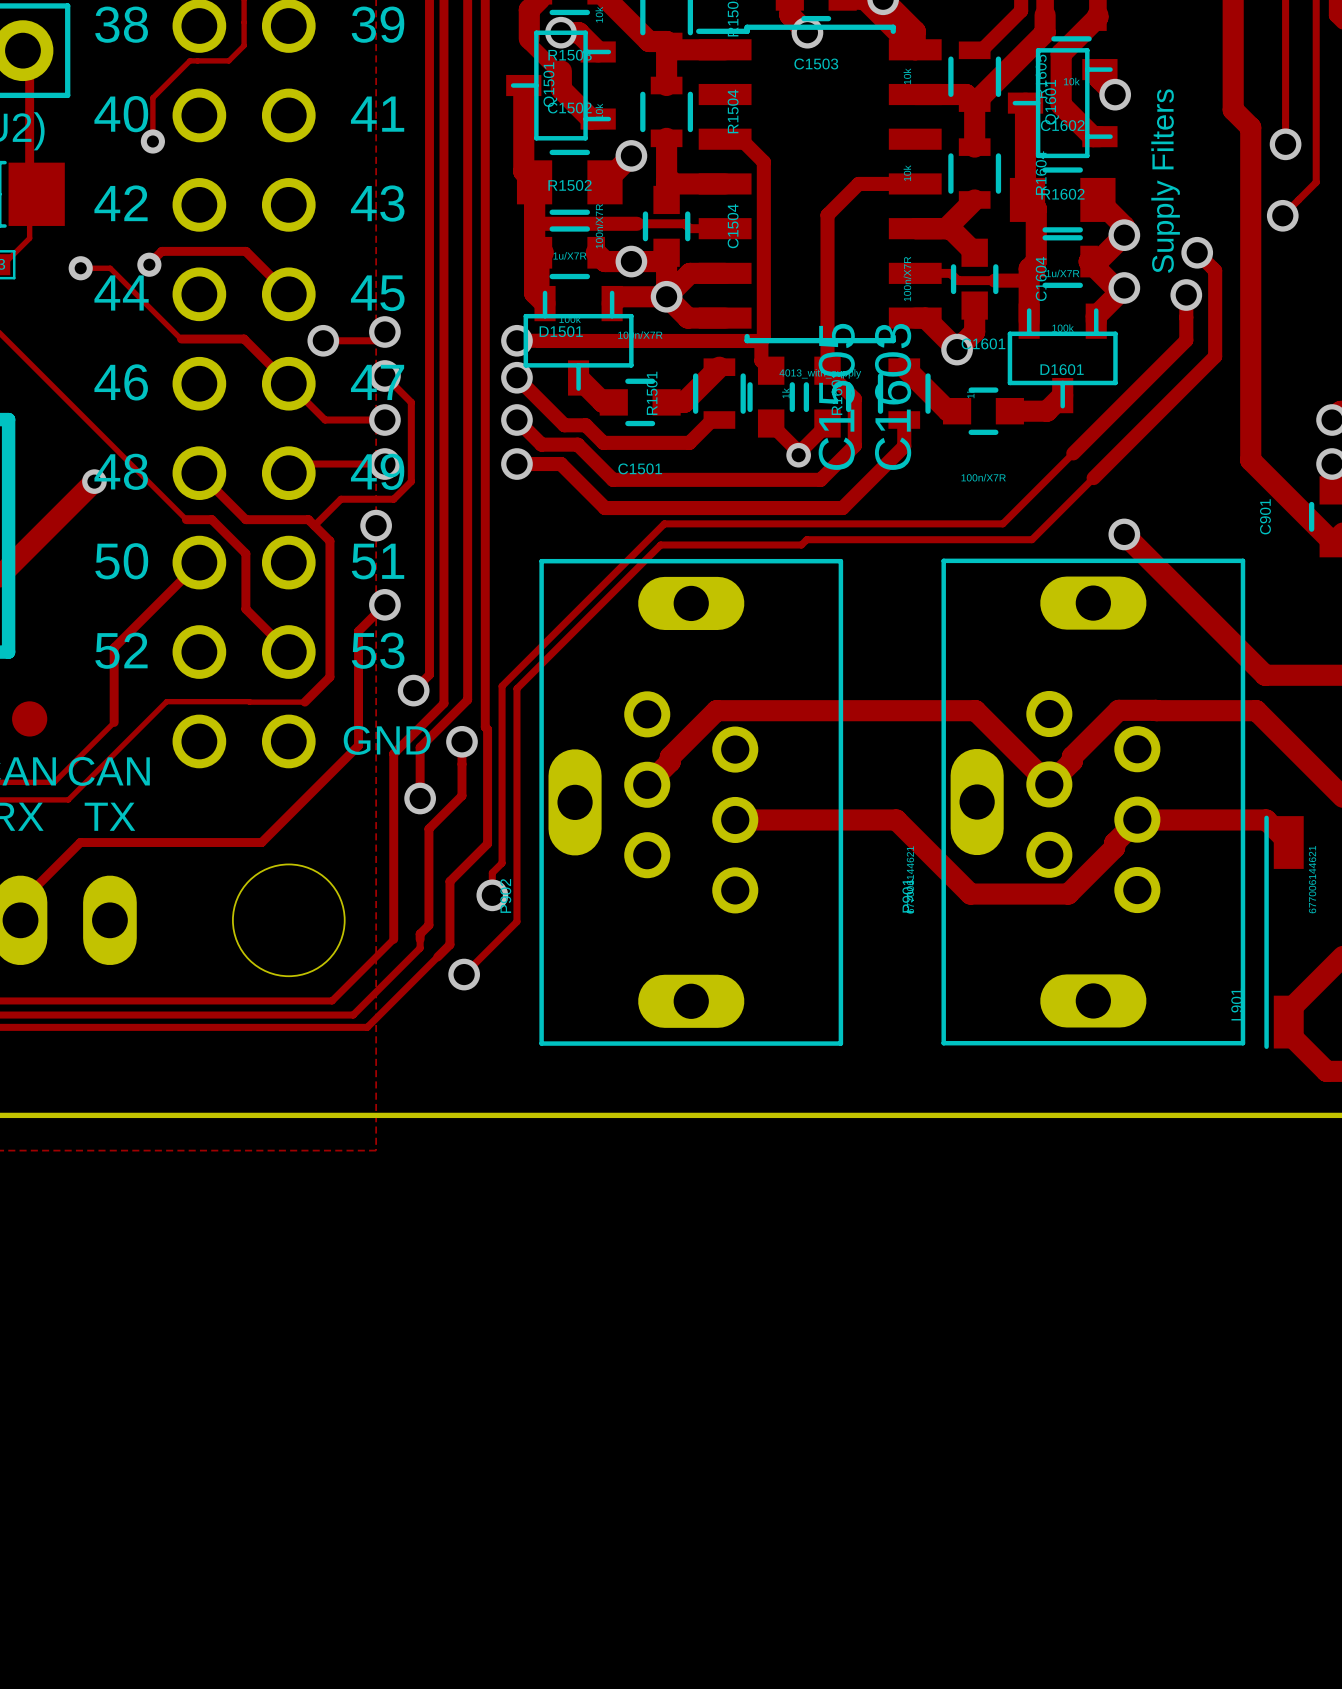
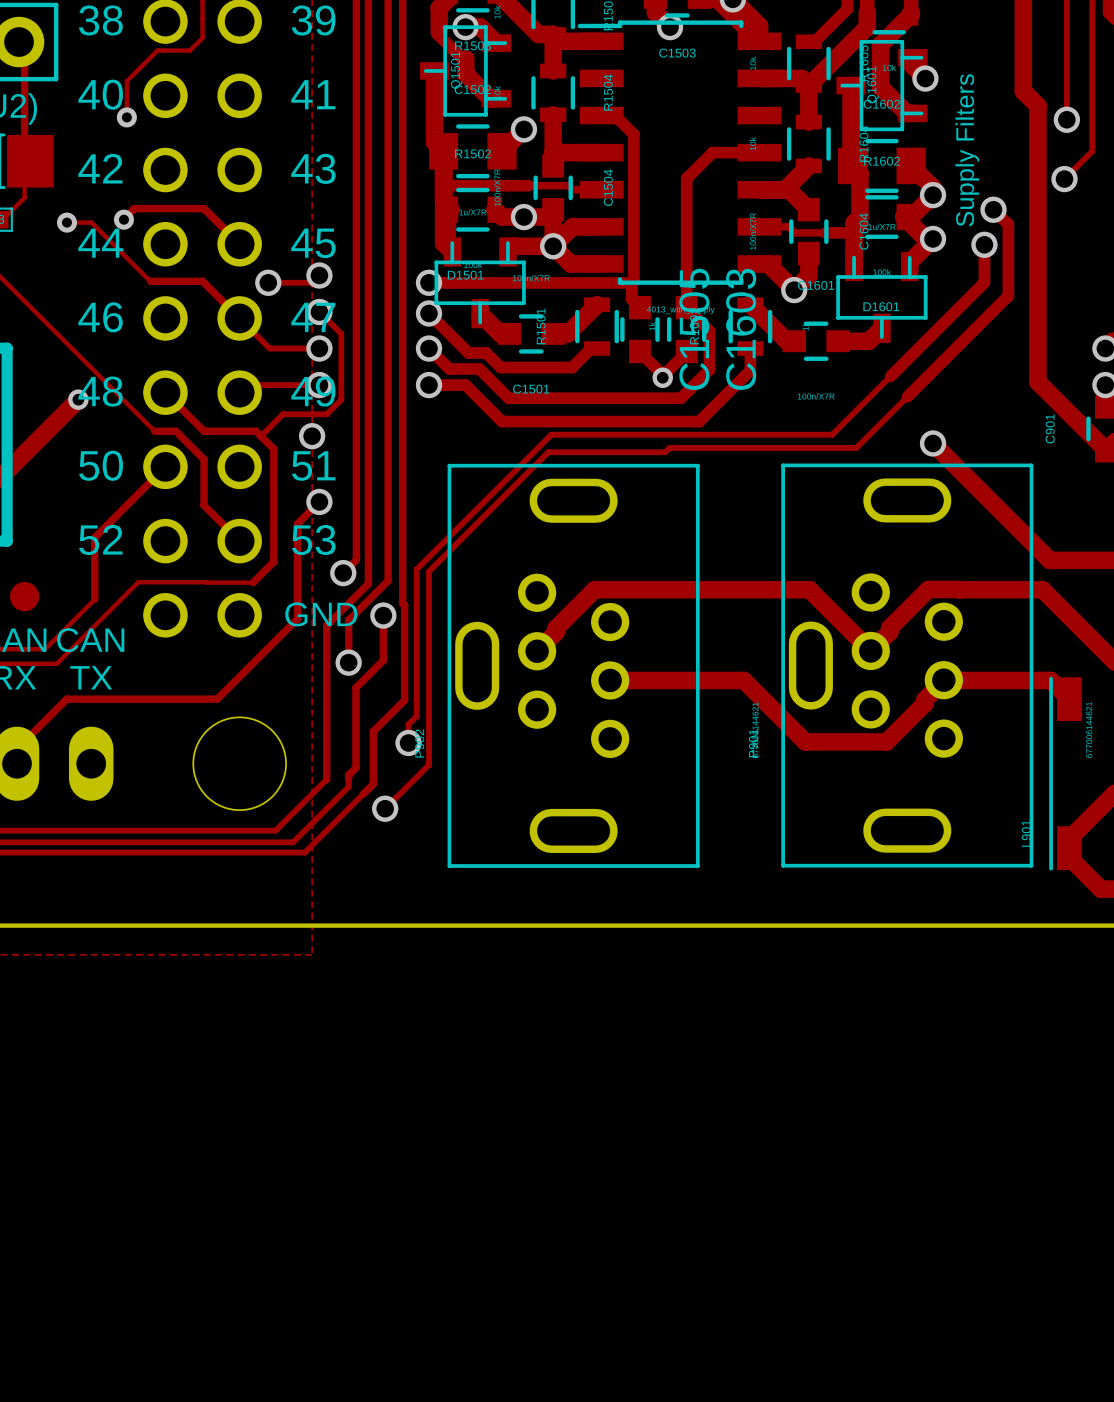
P902 footprint: [539, 558, 844, 1046] -> [447, 463, 700, 868]
P901 footprint: [941, 558, 1246, 1046] -> [781, 463, 1034, 868]

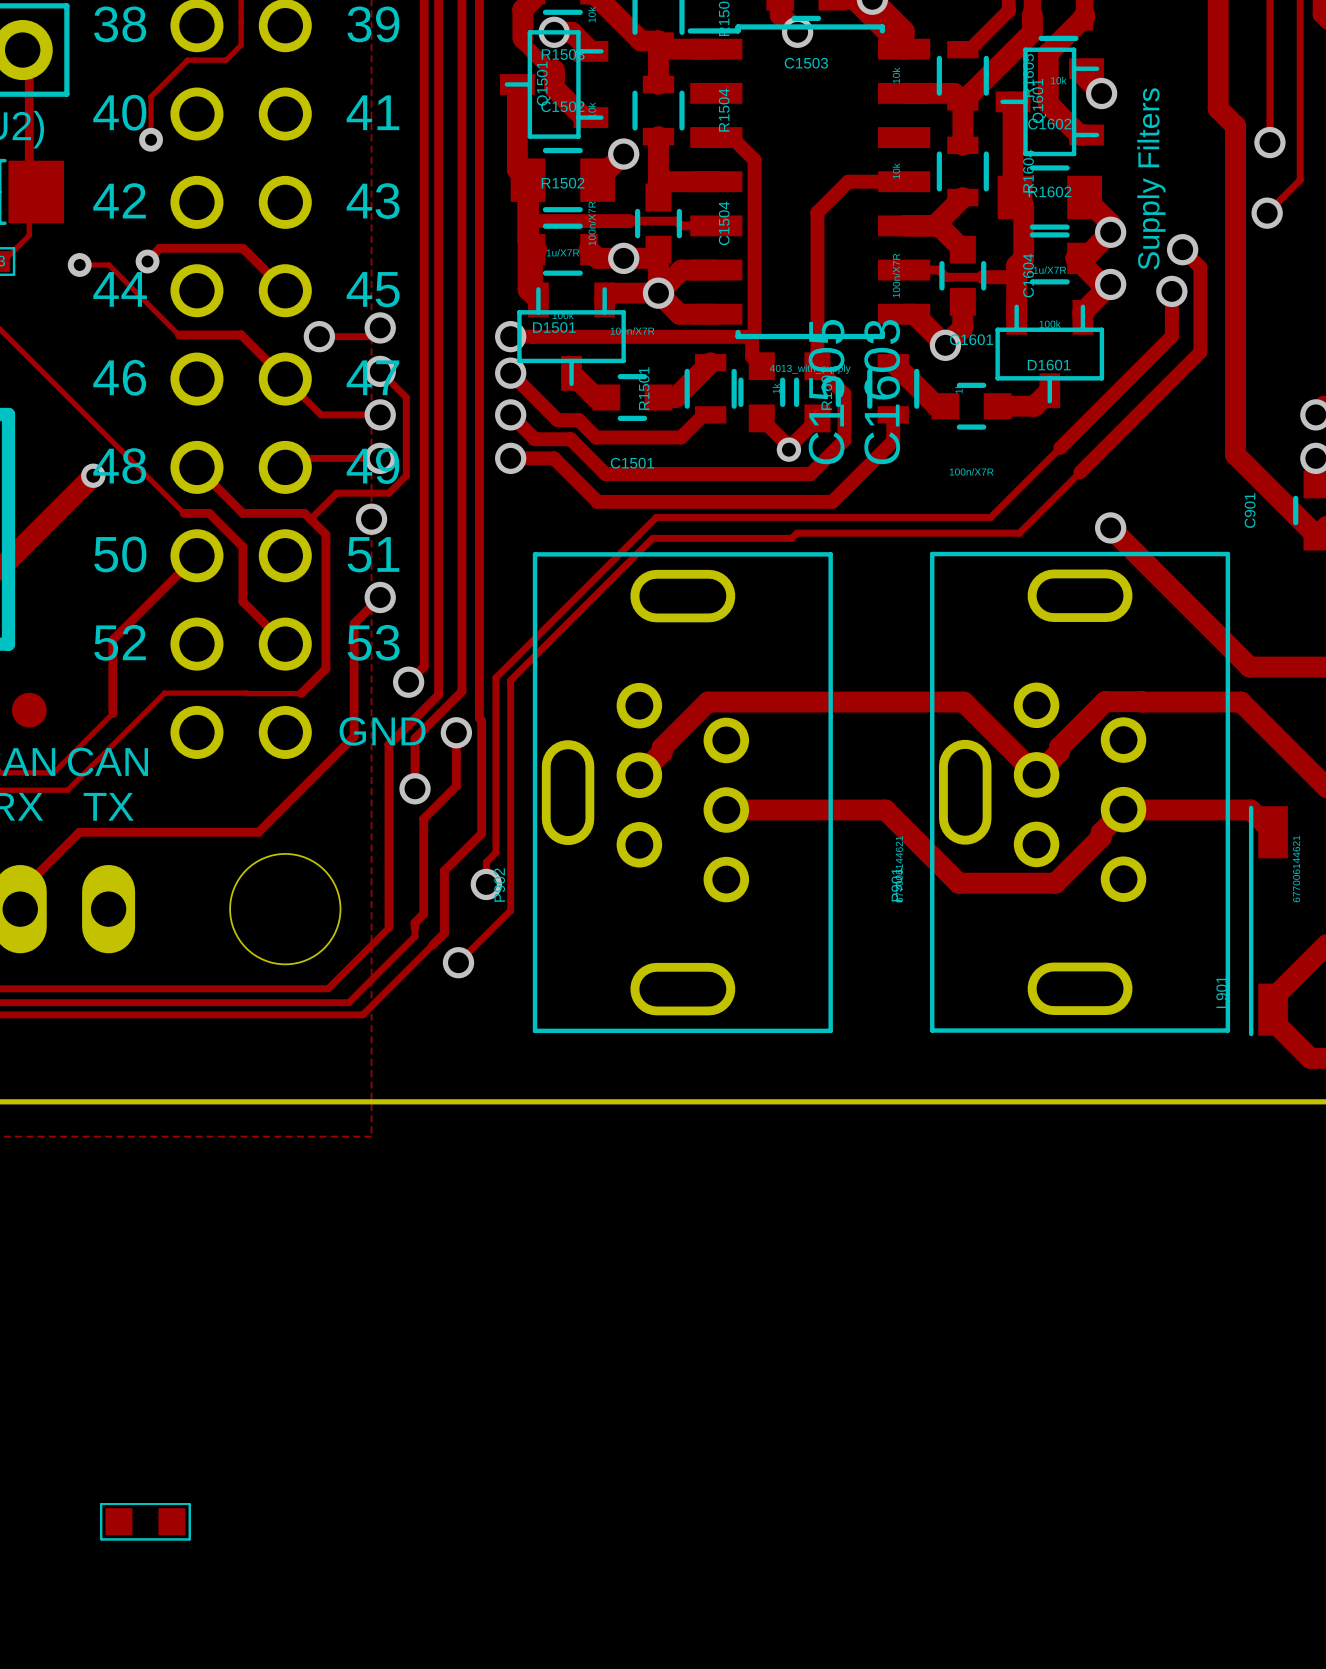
part: none -> (145, 1521)

